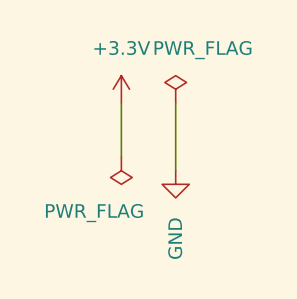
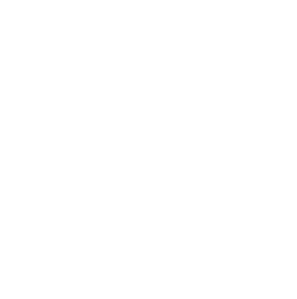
power symbol: +3.3V (121, 89) -> none
power symbol: PWR_FLAG (175, 89) -> none
wire: (121, 102) (121, 157) -> none
wire: (175, 102) (175, 170) -> none
power symbol: PWR_FLAG (121, 170) -> none
power symbol: GND (175, 184) -> none

